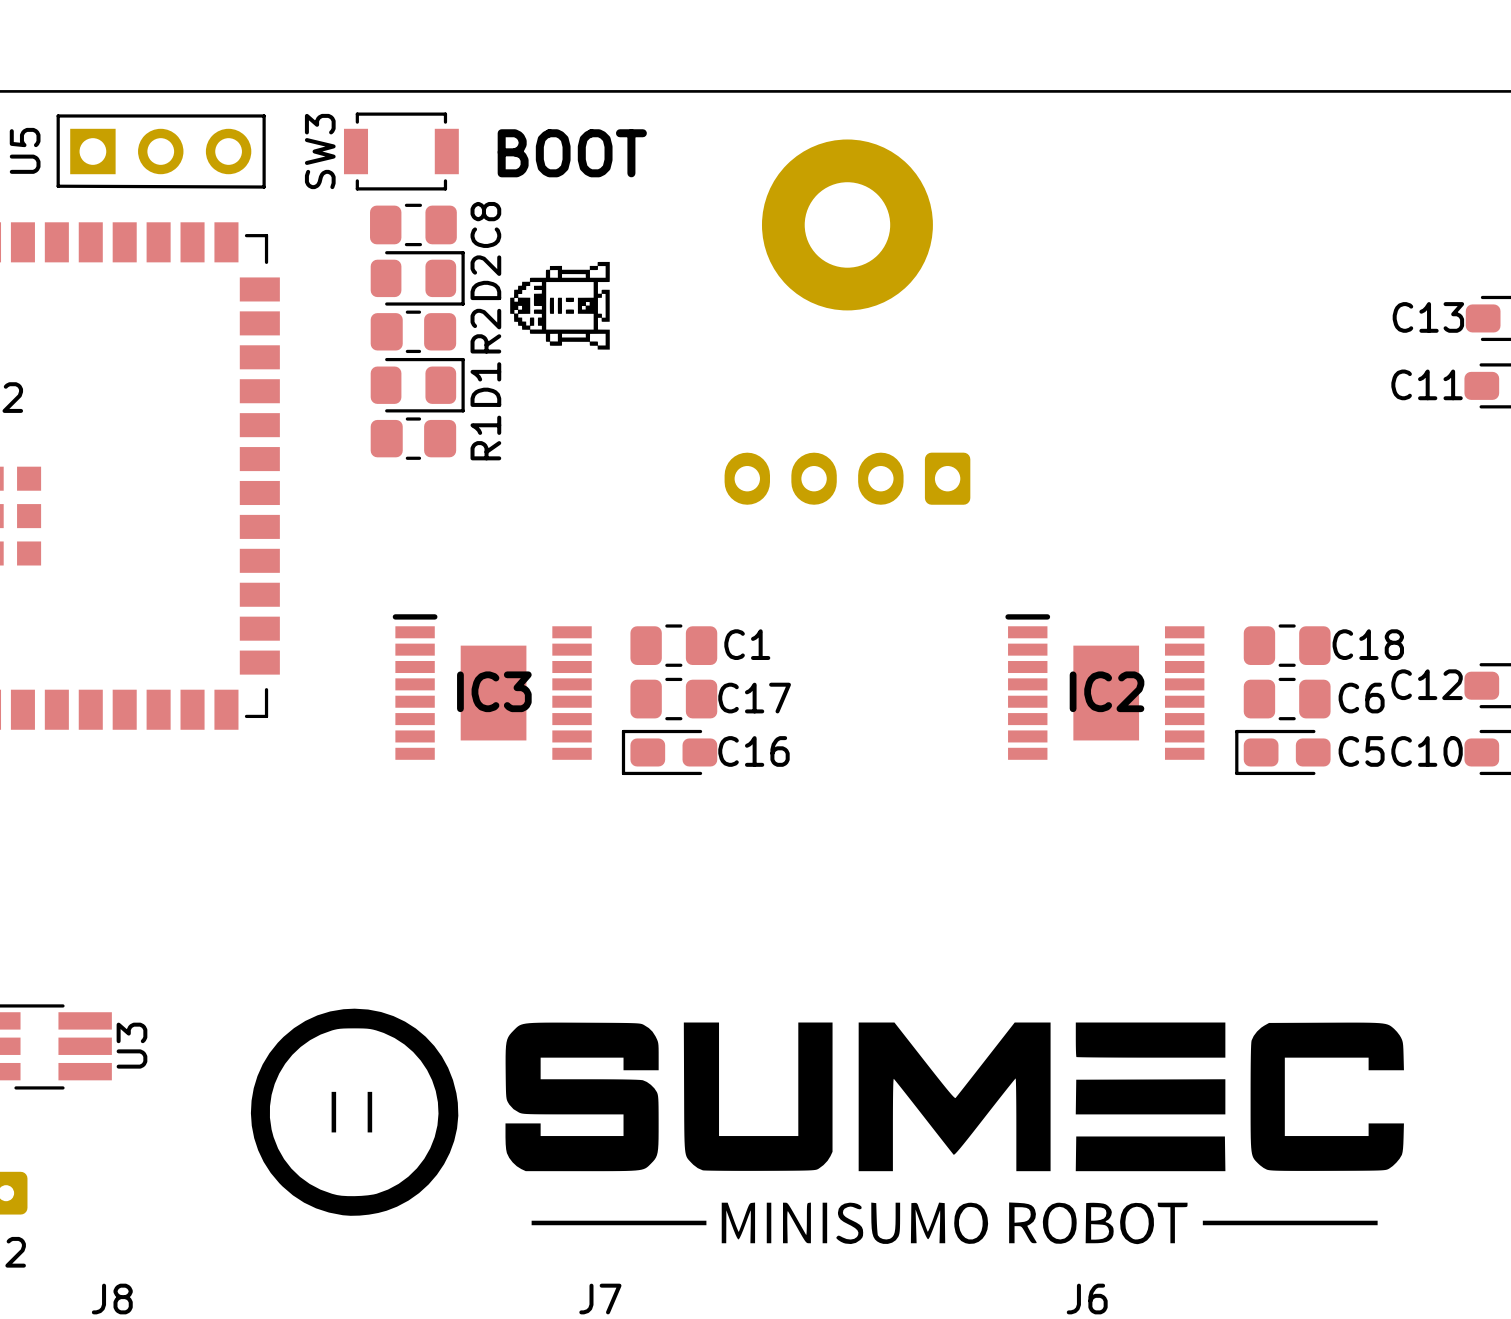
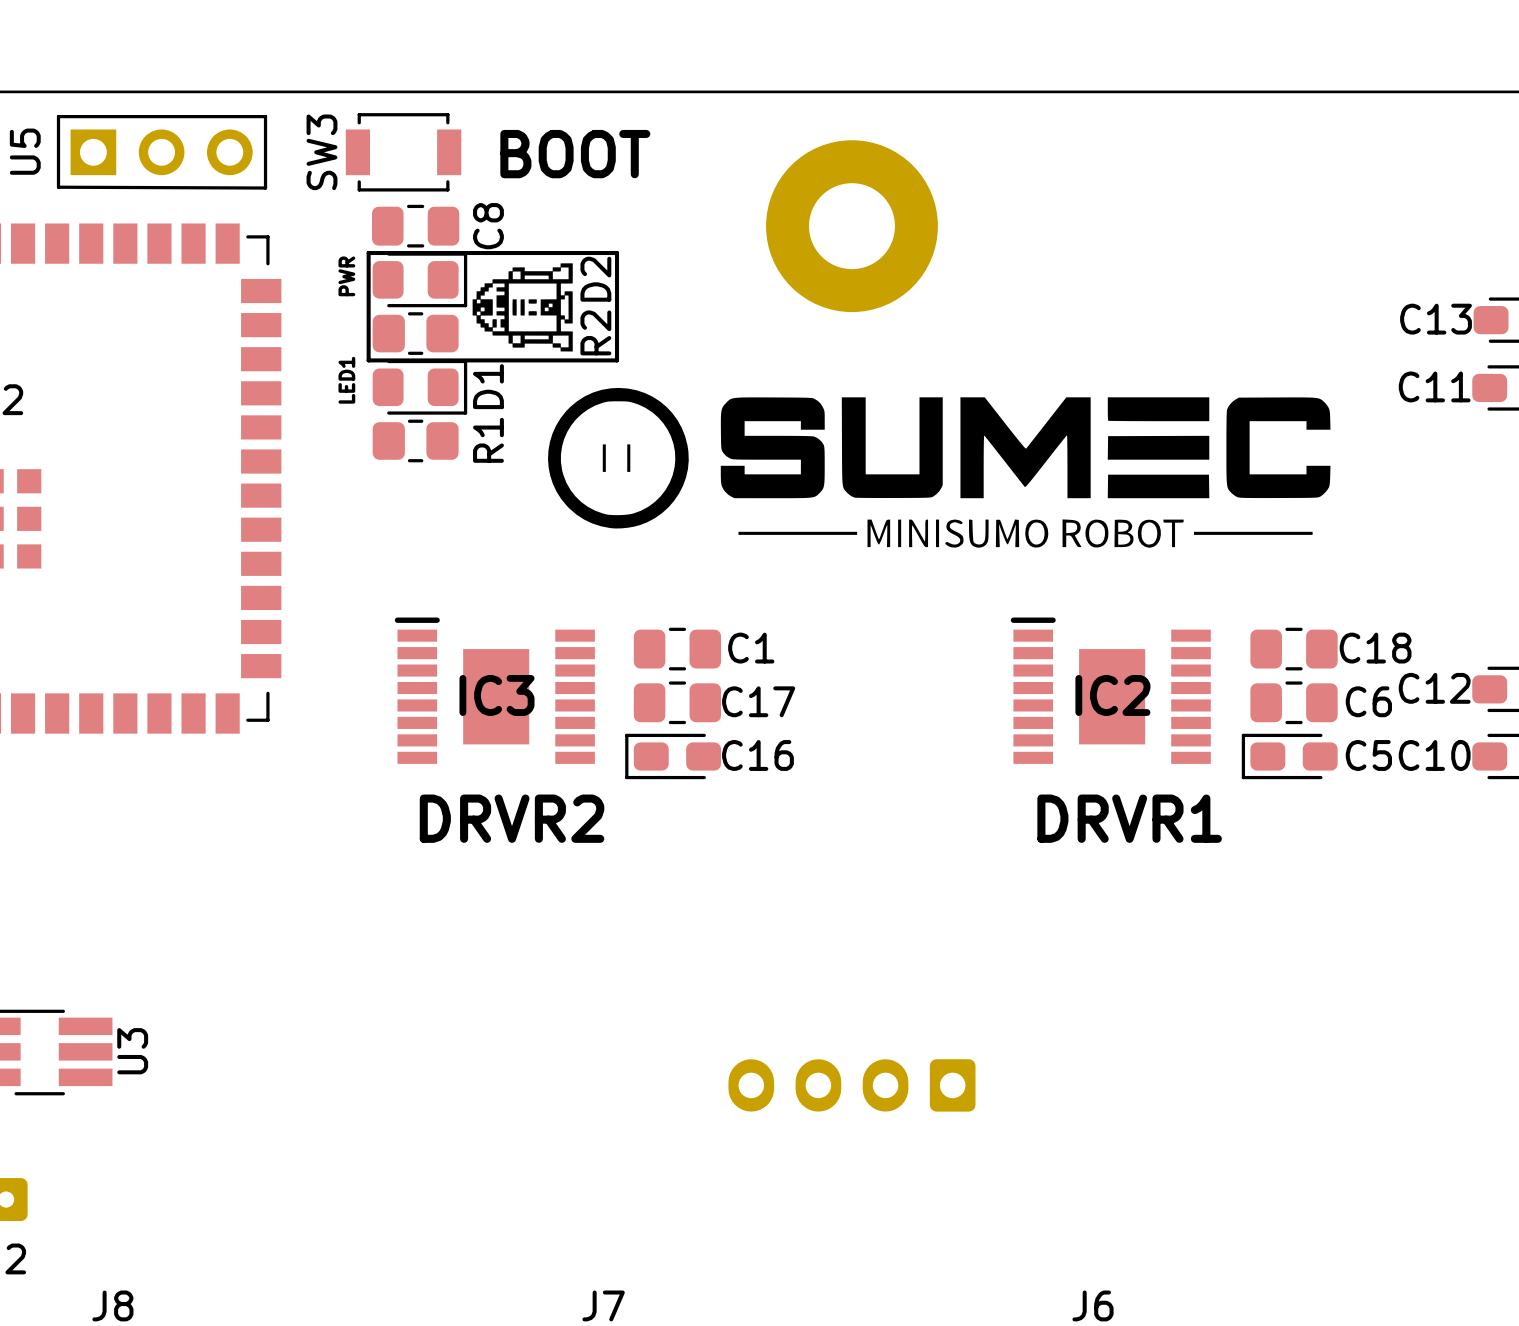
line: none -> (368, 253) (617, 253) (617, 360) (368, 360) (368, 253)
text: none -> PWR (346, 276)
D2 name position: D2 (485, 277) -> D2 (595, 279)
drawing position: (559, 305) -> (522, 307)
R2 name position: R2 (485, 331) -> R2 (595, 332)
text: none -> LED1 (346, 380)
drawing: none -> [548, 387, 1331, 548]
part position: (847, 478) -> (851, 1085)
text: none -> DRVR2 (512, 818)
text: none -> DRVR1 (1129, 818)
drawing: [250, 1008, 1404, 1245] -> none

